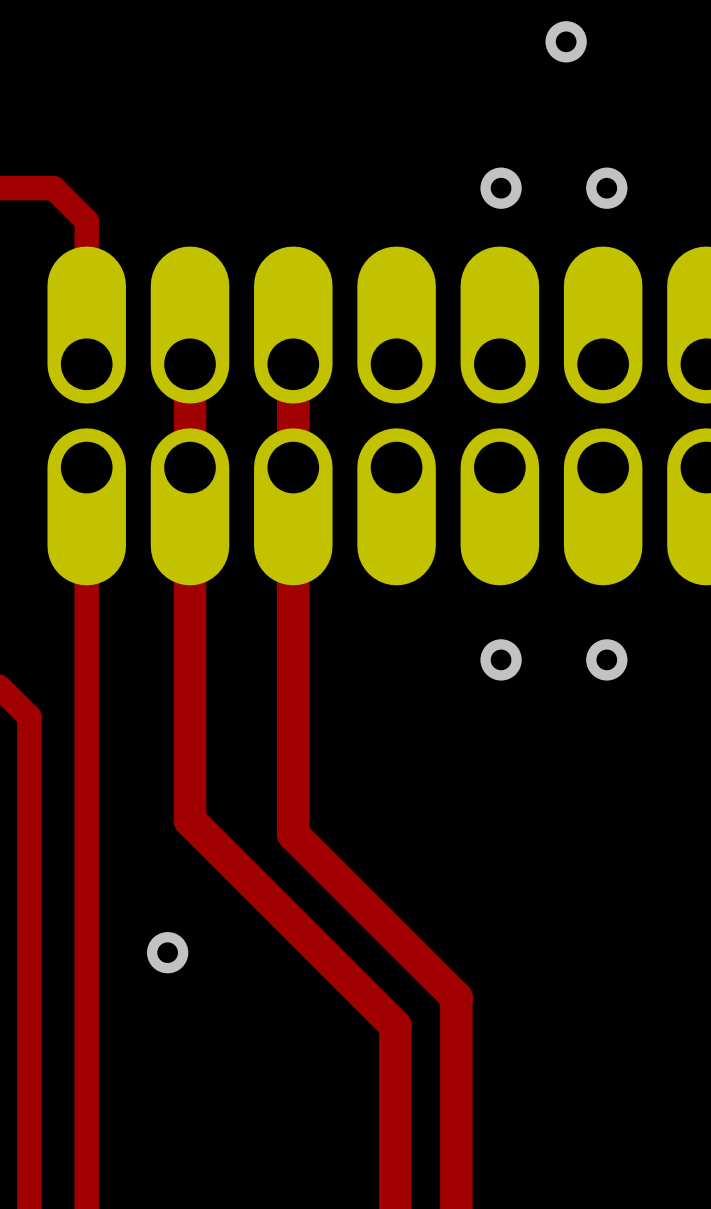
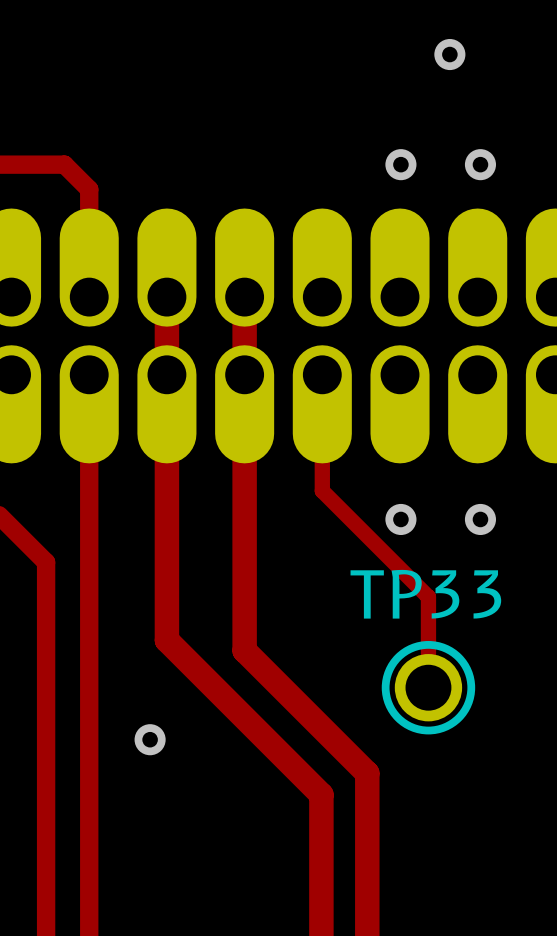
track: none -> (322, 374) (322, 490) (428, 597) (428, 687)
TP33: none -> (428, 687)

